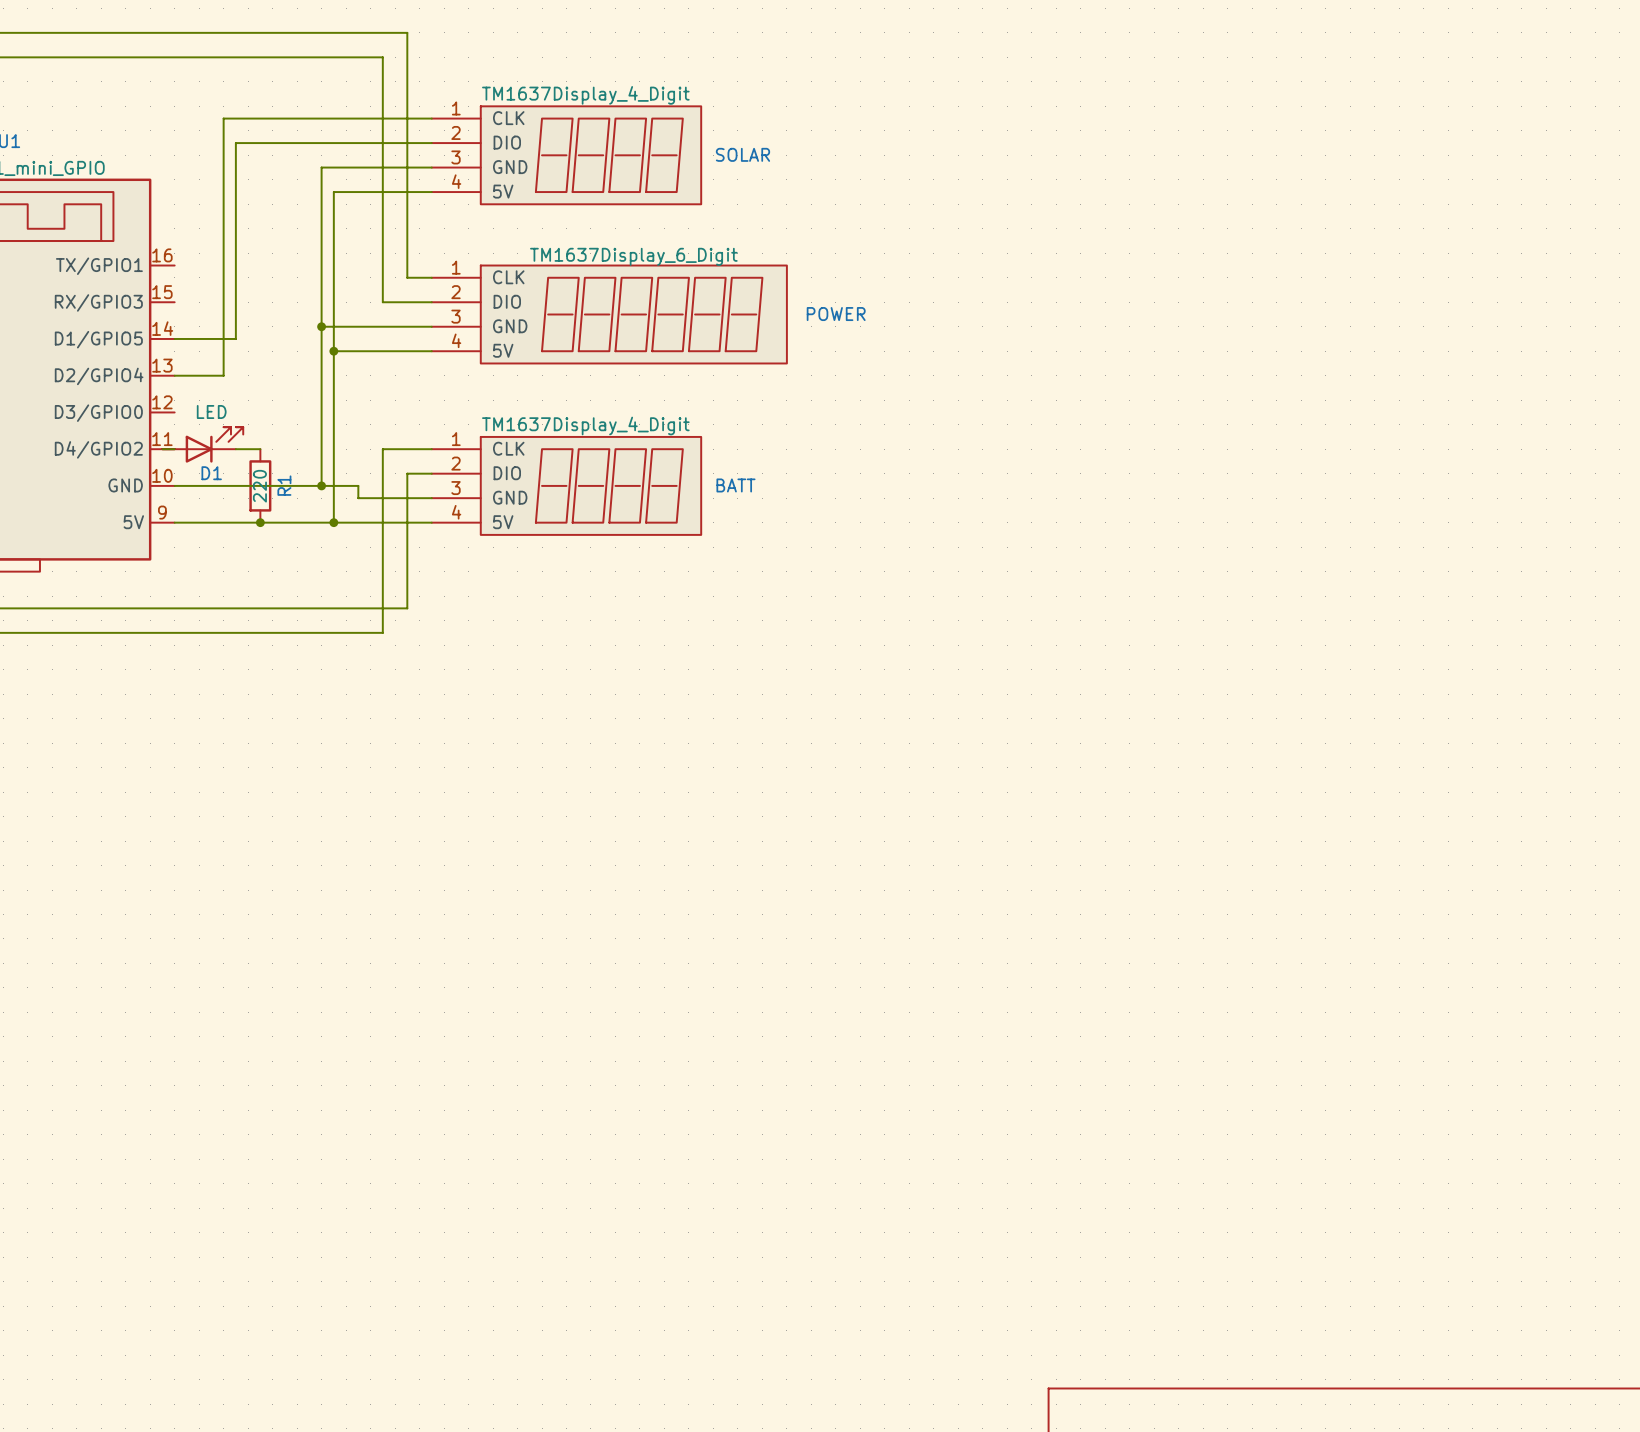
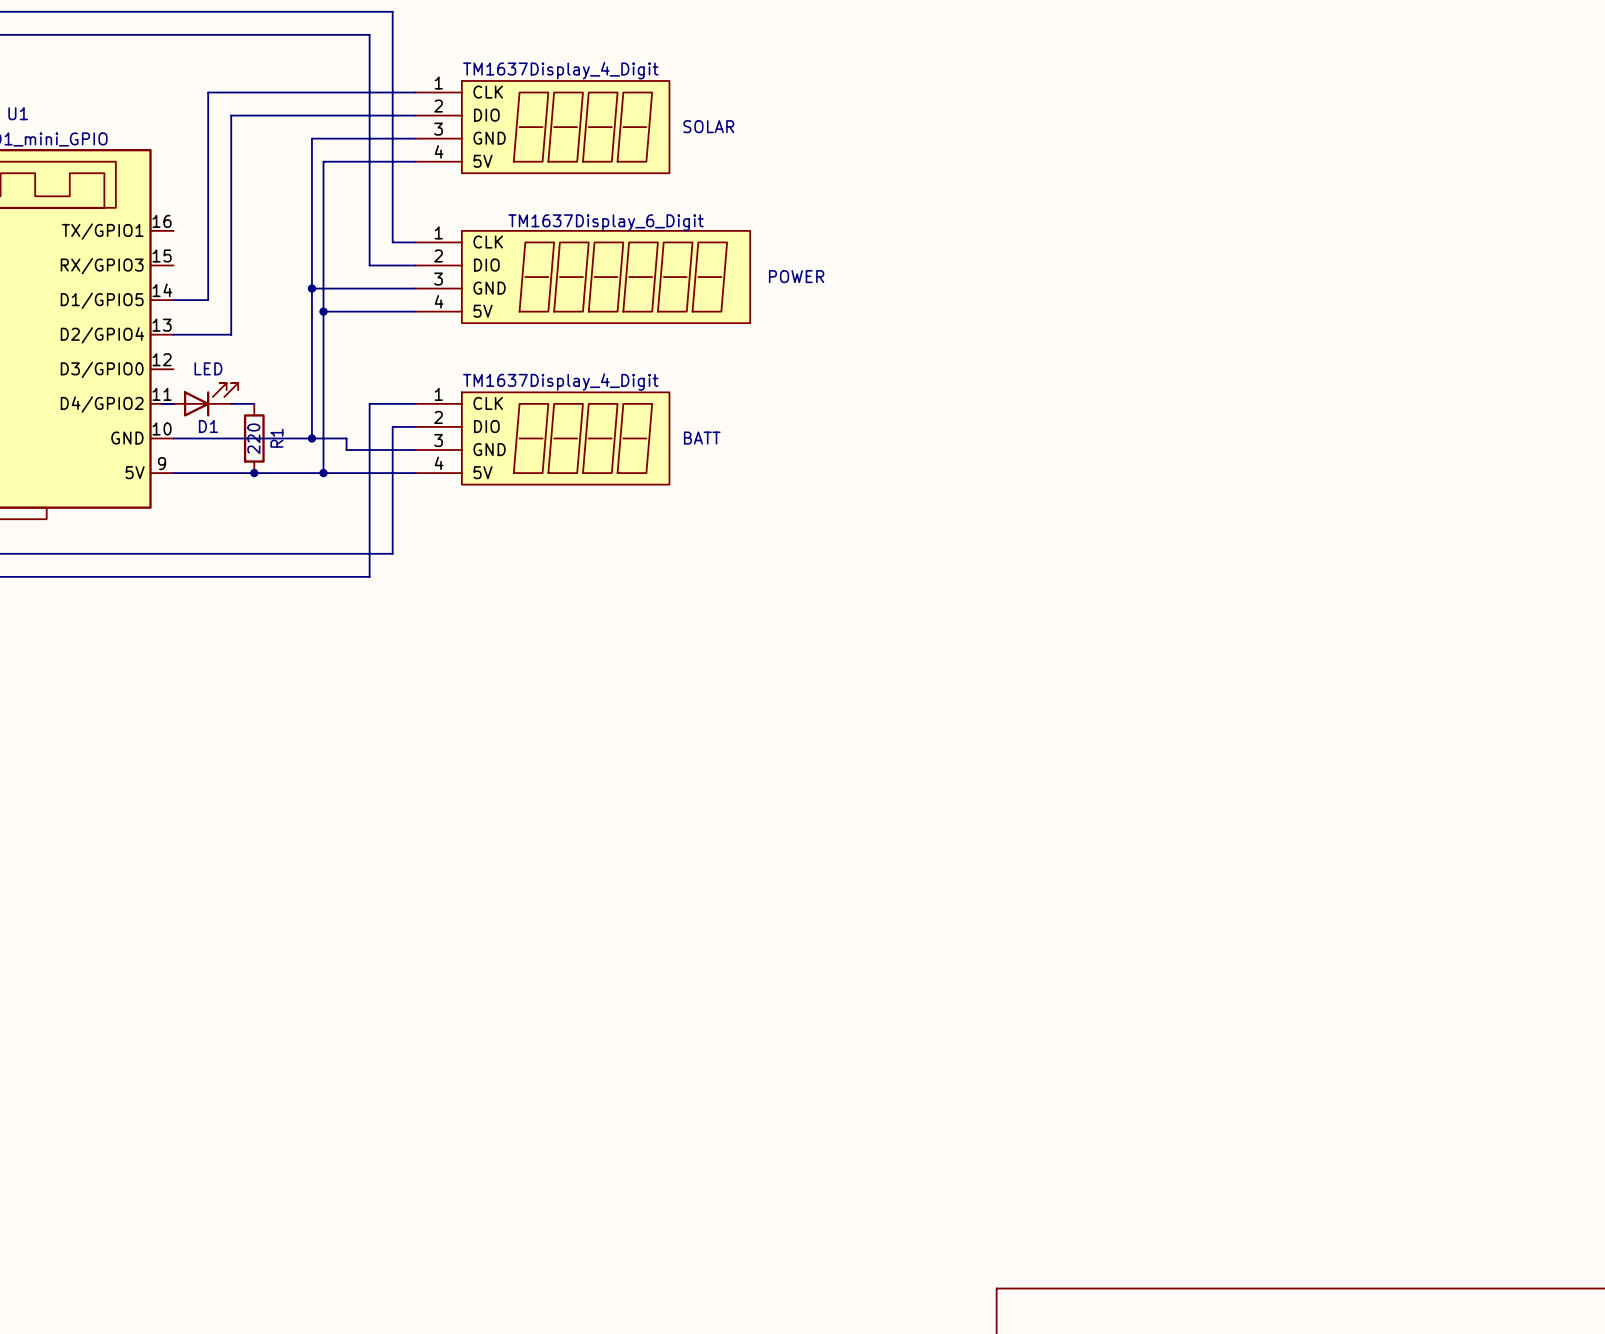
wire: (223, 118) (223, 375) -> (219, 92) (208, 92) (208, 300)
wire: (211, 338) (235, 338) -> (219, 334) (231, 334) (231, 300)

